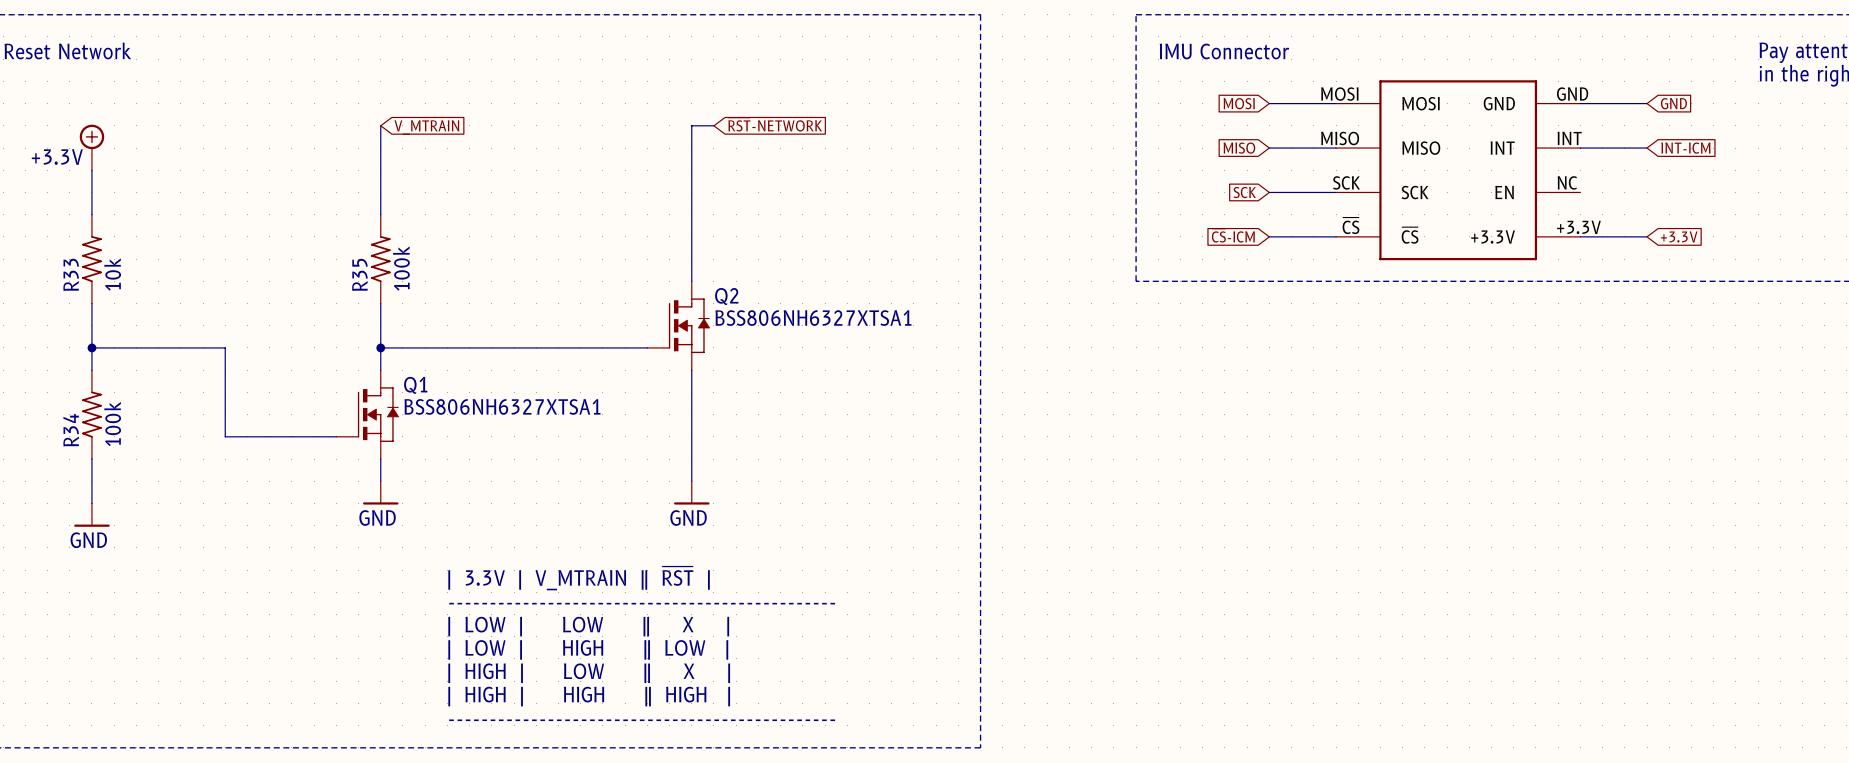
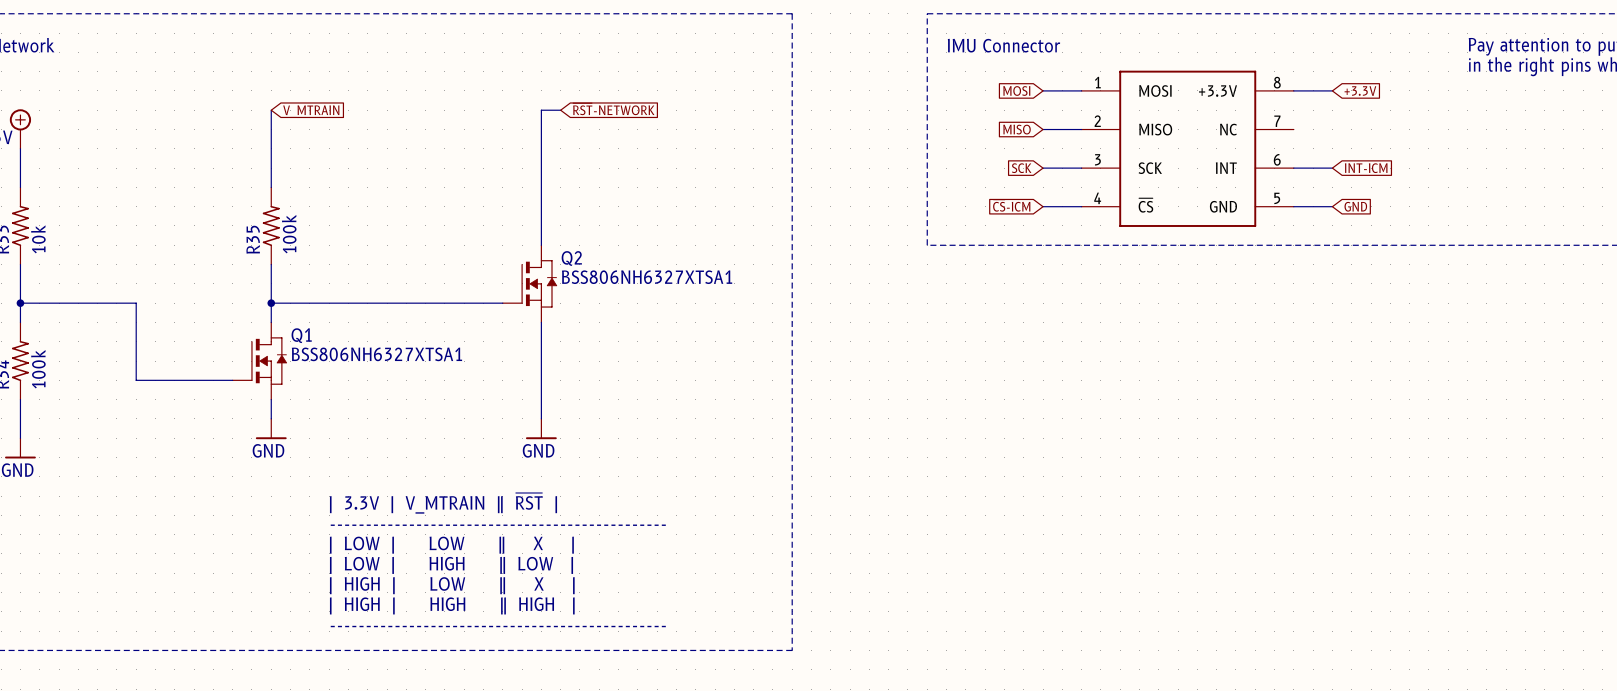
wire: (1602, 103) (1647, 103) -> none
global label position: GND (1673, 103) -> GND (1355, 206)
wire: (1580, 148) (1647, 148) -> none
global label position: INT-ICM (1685, 148) -> INT-ICM (1366, 168)
part: none -> (1187, 148)
part: (1458, 170) -> none
wire: (1602, 236) (1647, 236) -> (1293, 168) (1332, 168)
global label position: +3.3V (1679, 236) -> +3.3V (1360, 90)

